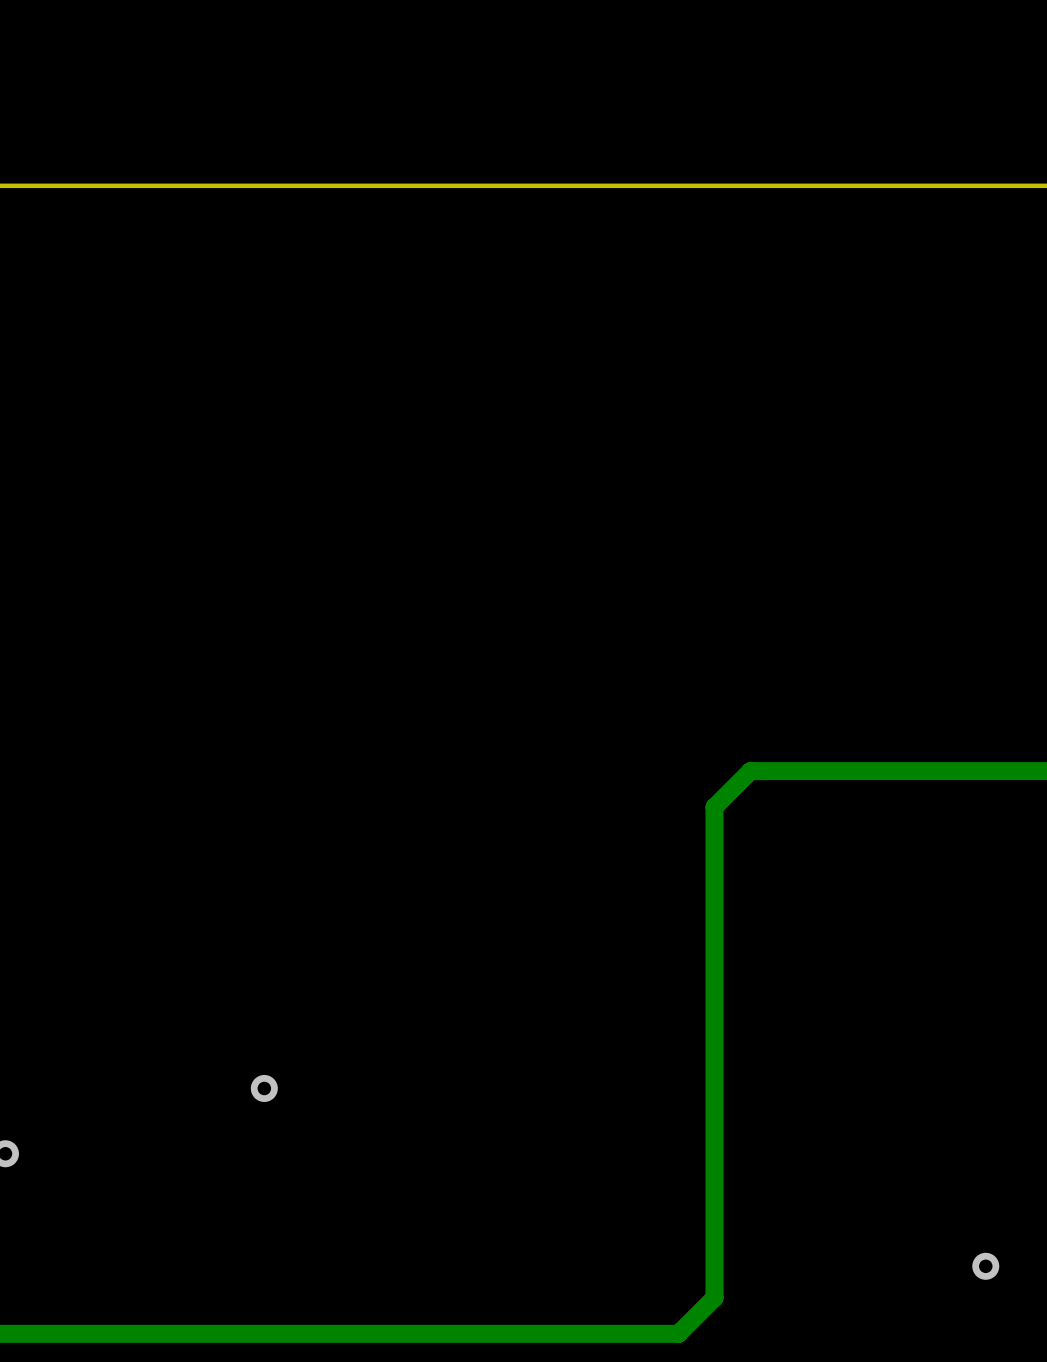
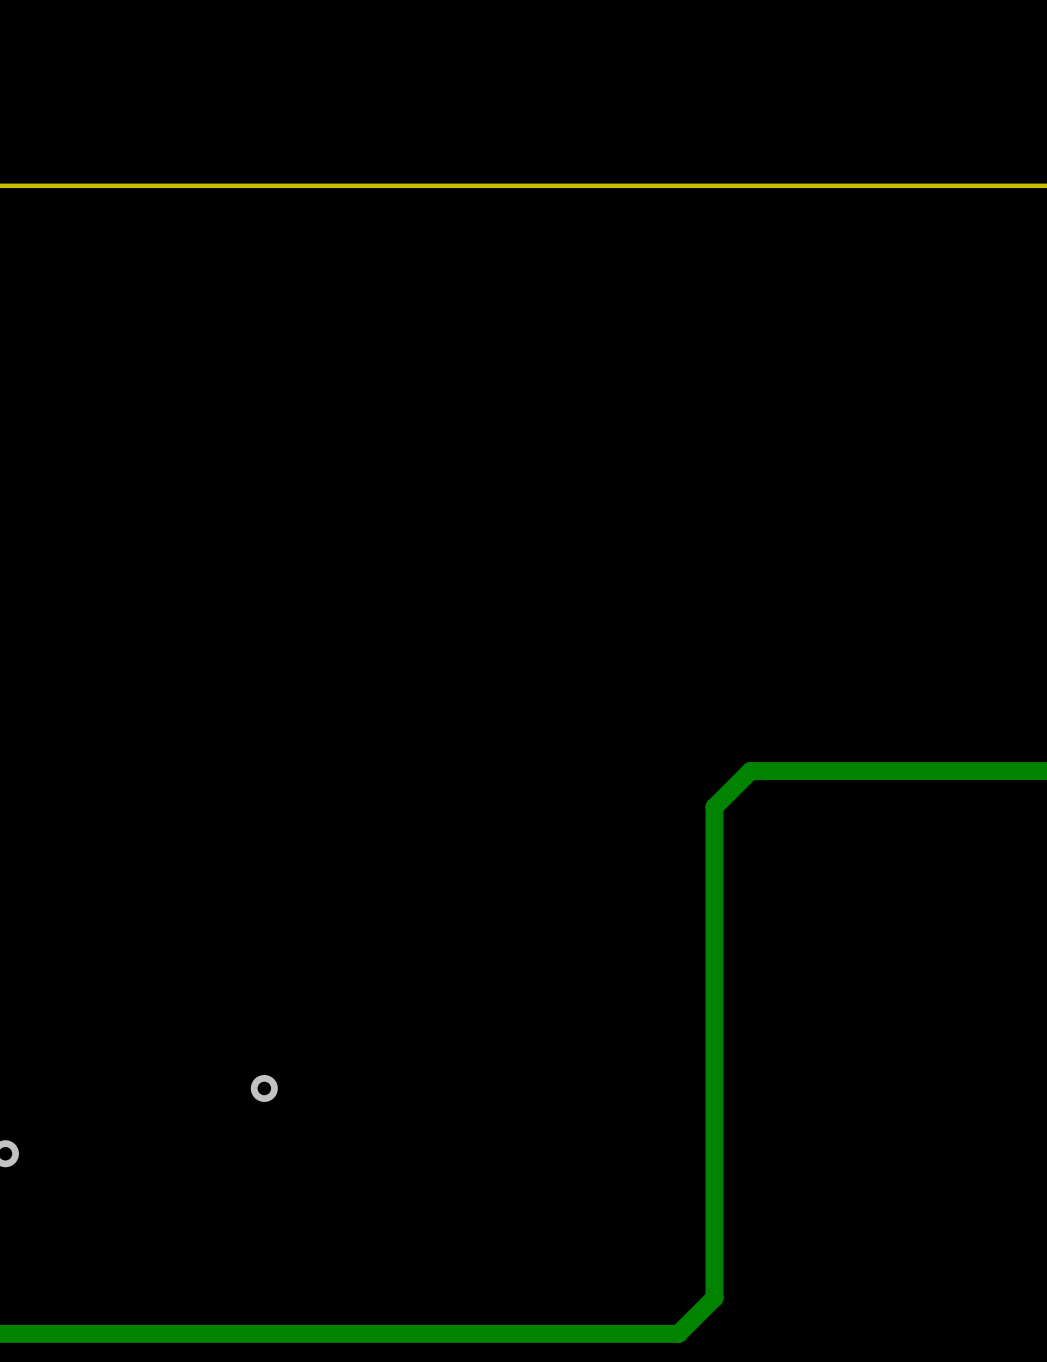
via: (985, 1266) -> none

